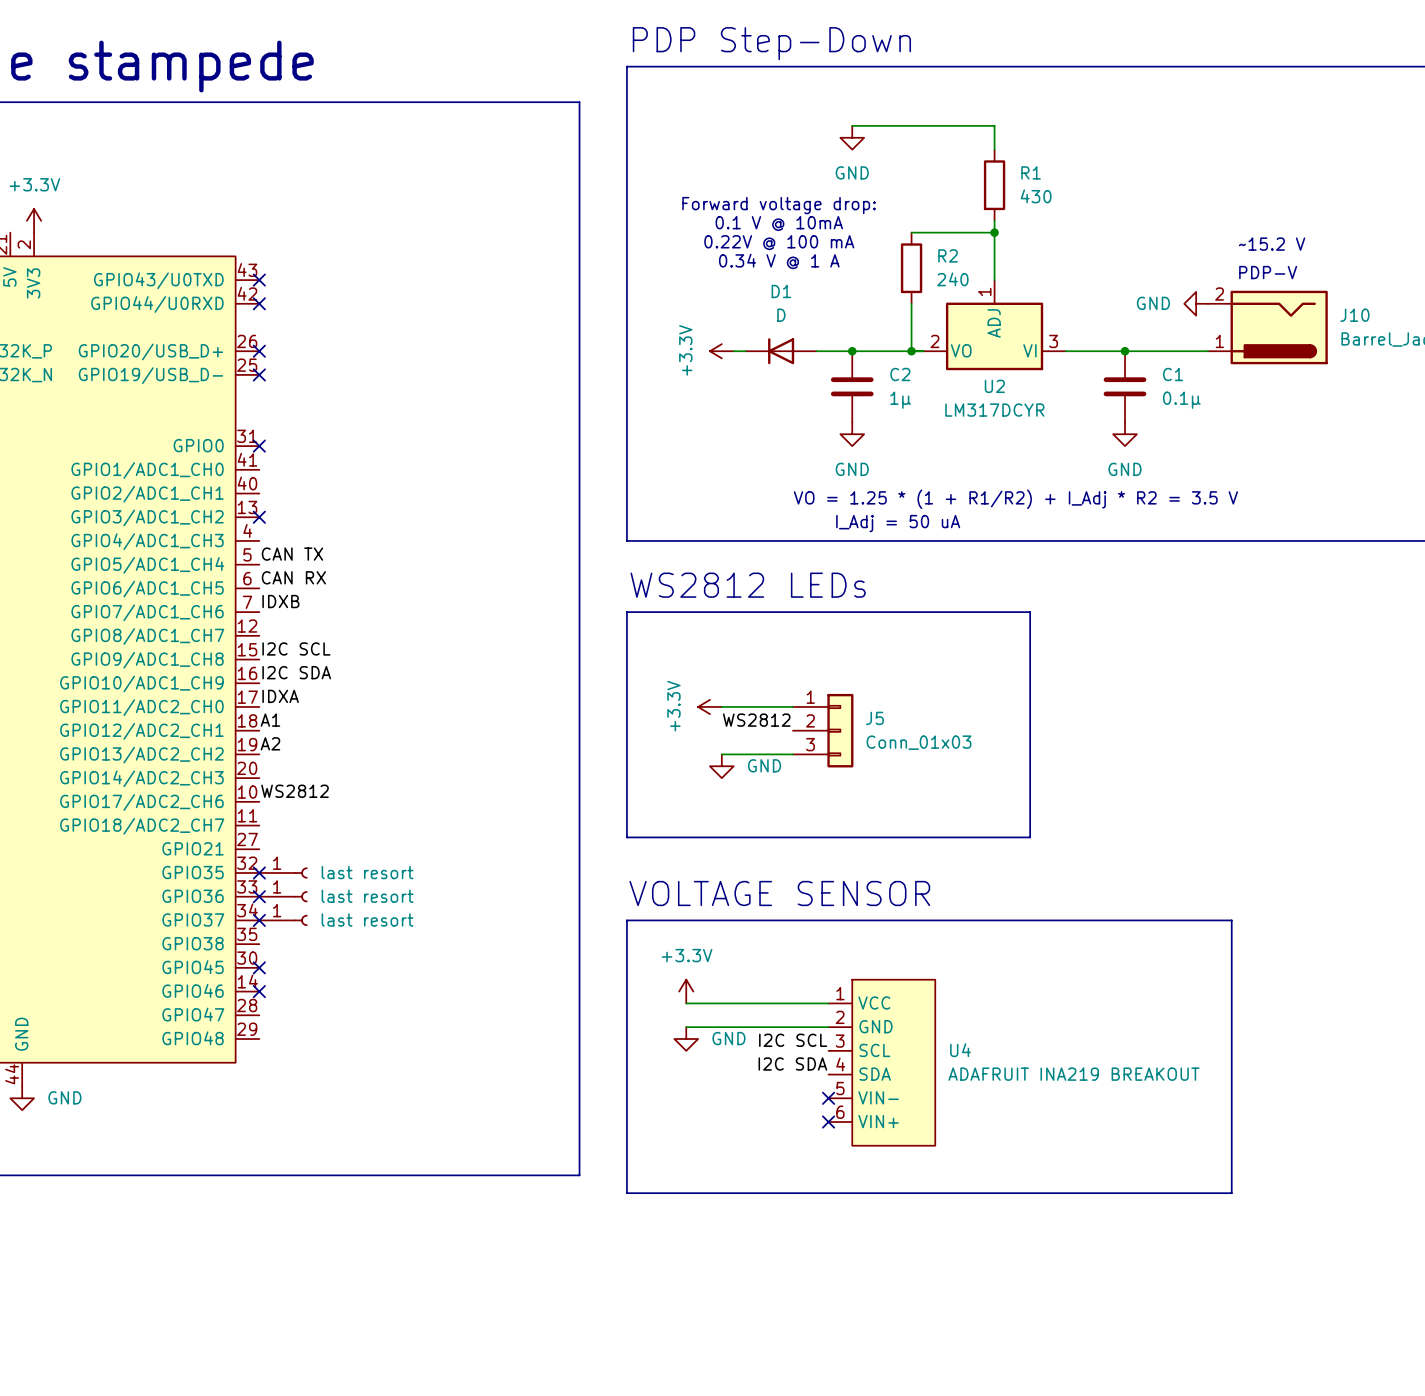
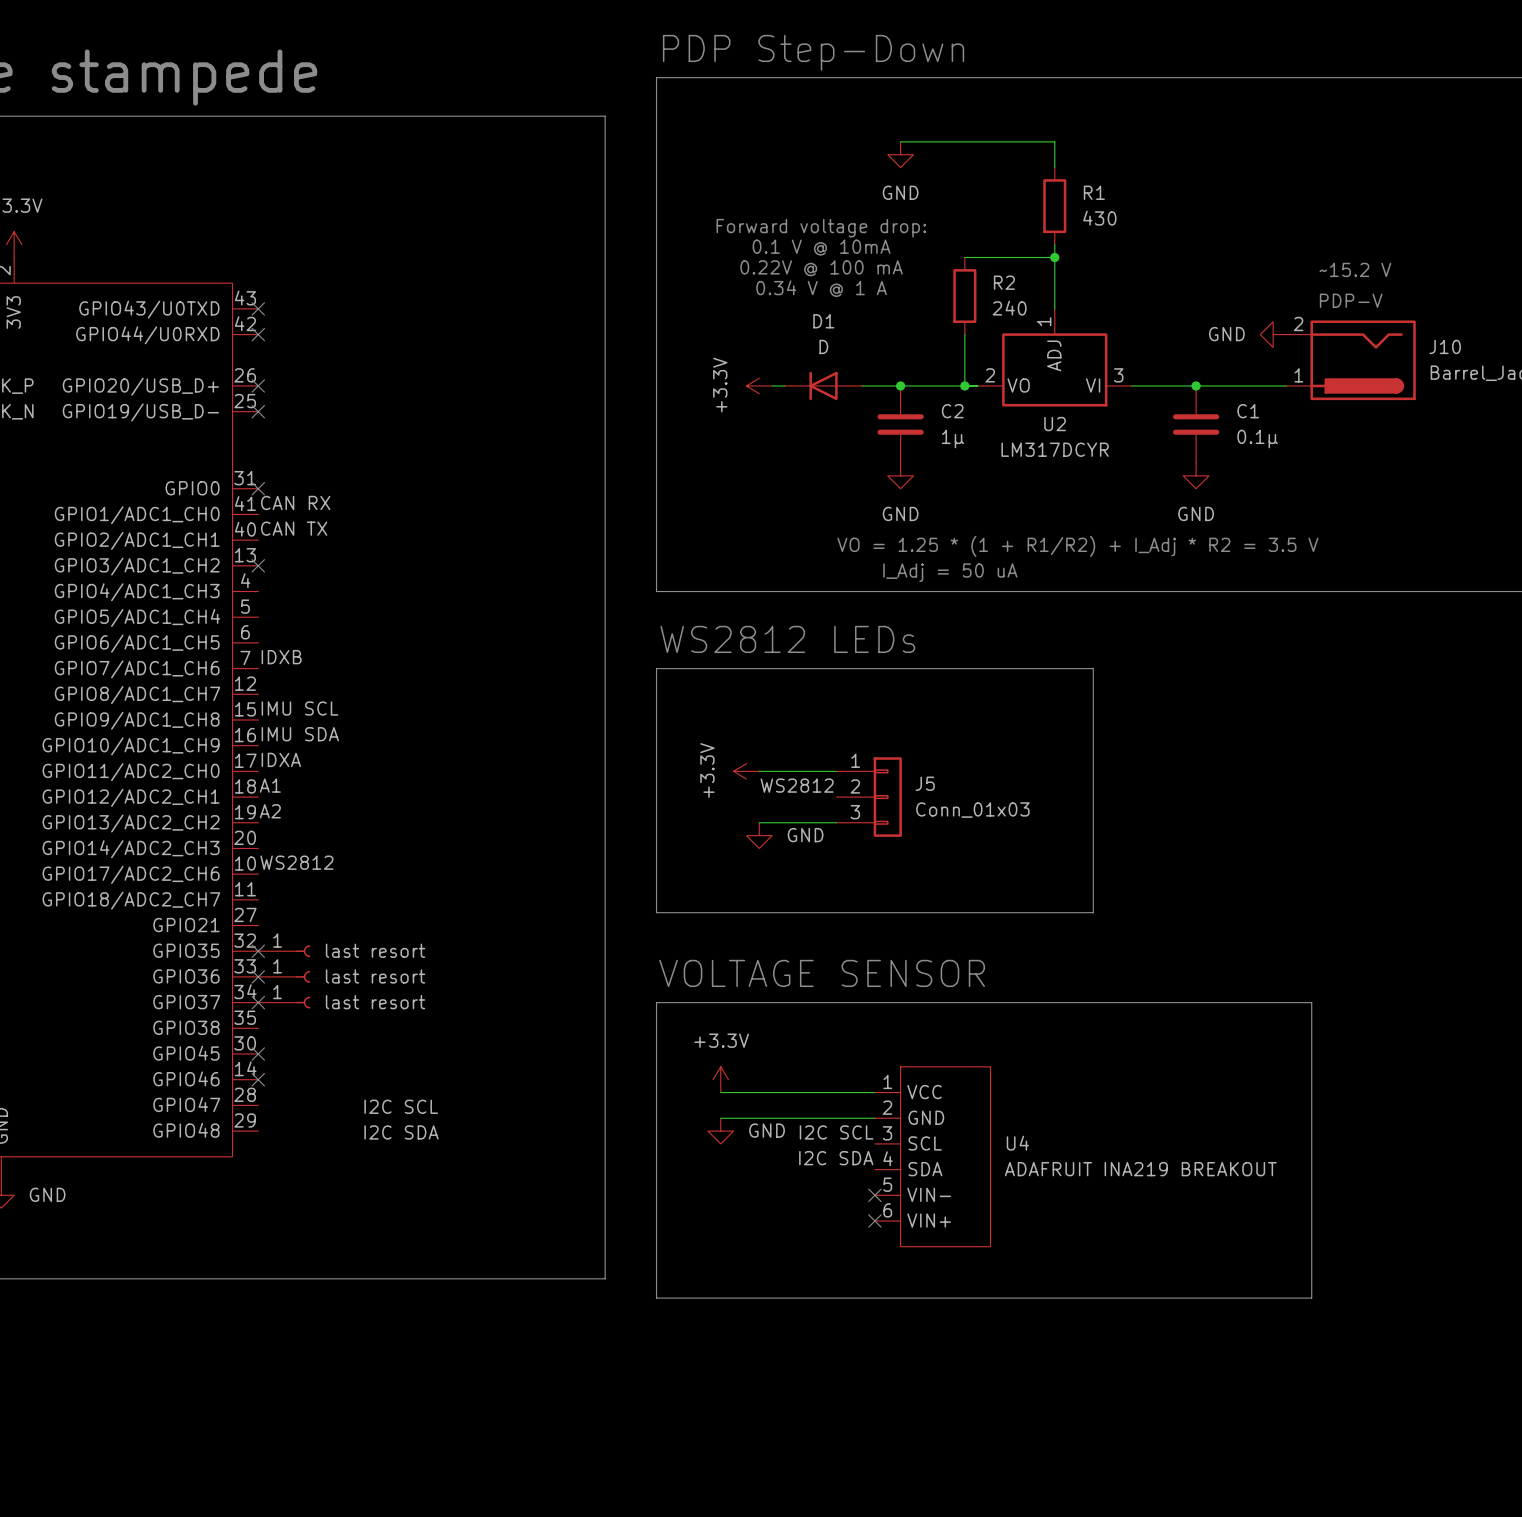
label position: CAN TX (292, 554) -> CAN TX (294, 528)
label position: CAN RX (293, 577) -> CAN RX (295, 502)
label: I2C SCL (296, 648) -> IMU SCL (299, 708)
label: I2C SDA (296, 672) -> IMU SDA (300, 734)
label: none -> I2C SCL (401, 1106)
label: none -> I2C SDA (401, 1132)

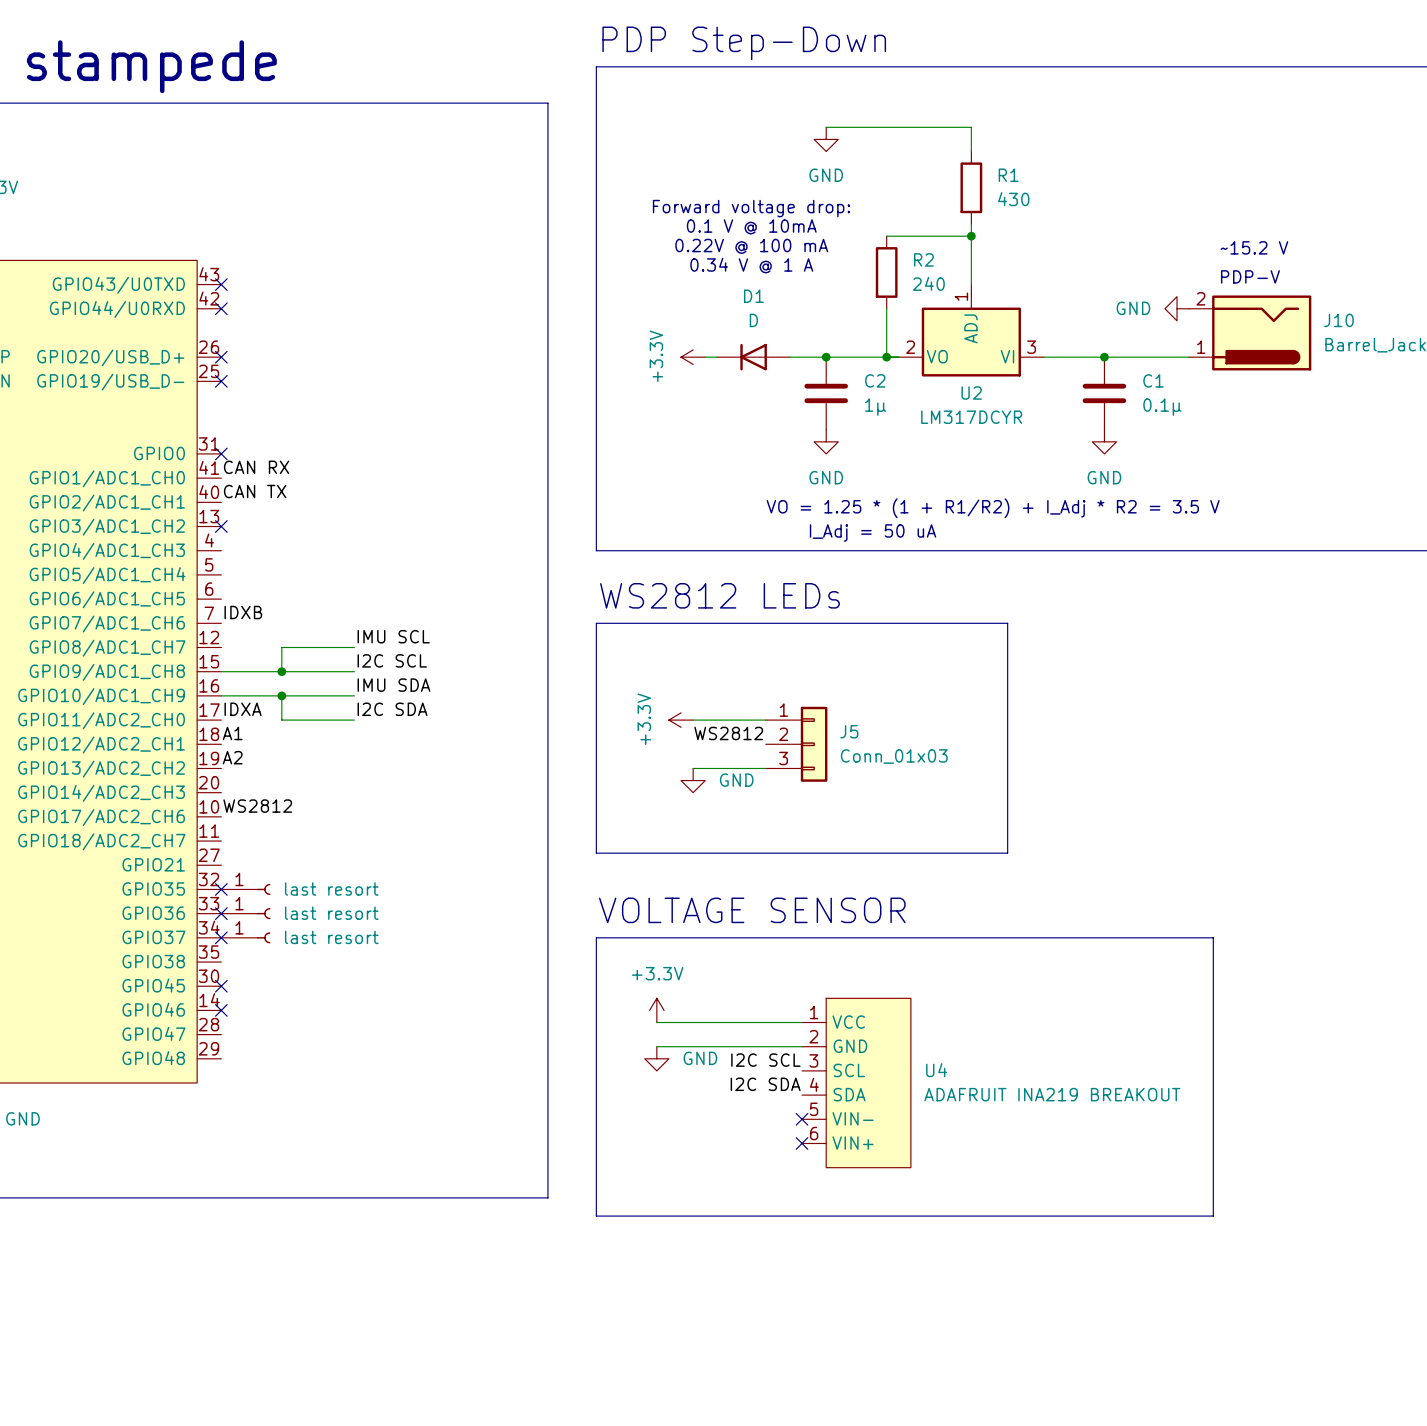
wire: none -> (354, 647) (281, 647) (281, 671)
label position: IMU SCL (299, 708) -> IMU SCL (393, 636)
label: none -> I2C SCL (392, 660)
wire: none -> (221, 671) (354, 671)
junction: none -> (281, 671)
label position: IMU SDA (300, 734) -> IMU SDA (393, 685)
wire: none -> (221, 695) (354, 695)
wire: none -> (281, 695) (281, 720) (354, 720)
junction: none -> (281, 695)
label: none -> I2C SDA (392, 709)
label: I2C SCL (401, 1106) -> none
label: I2C SDA (401, 1132) -> none

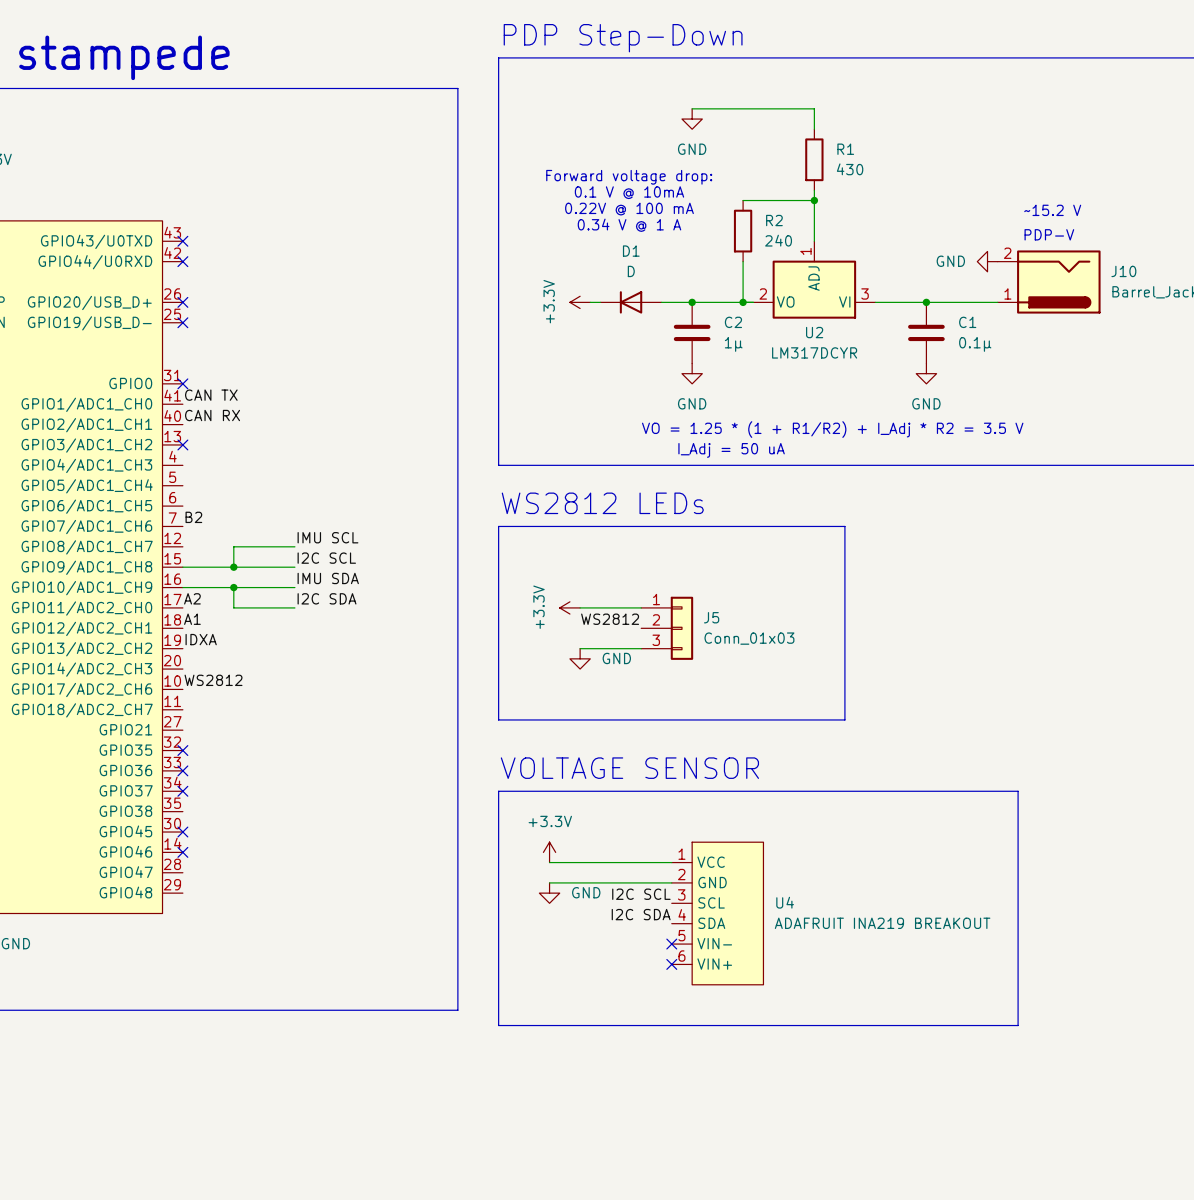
label: CAN RX (256, 467) -> CAN TX (211, 395)
label: CAN TX (255, 491) -> CAN RX (212, 415)
label: IDXB (243, 612) -> B2 (193, 517)
label: IDXA (243, 709) -> A2 (192, 598)
label: A2 (232, 757) -> IDXA (201, 639)
part: last resort (245, 889) -> none
part: last resort (245, 913) -> none
part: last resort (245, 937) -> none

